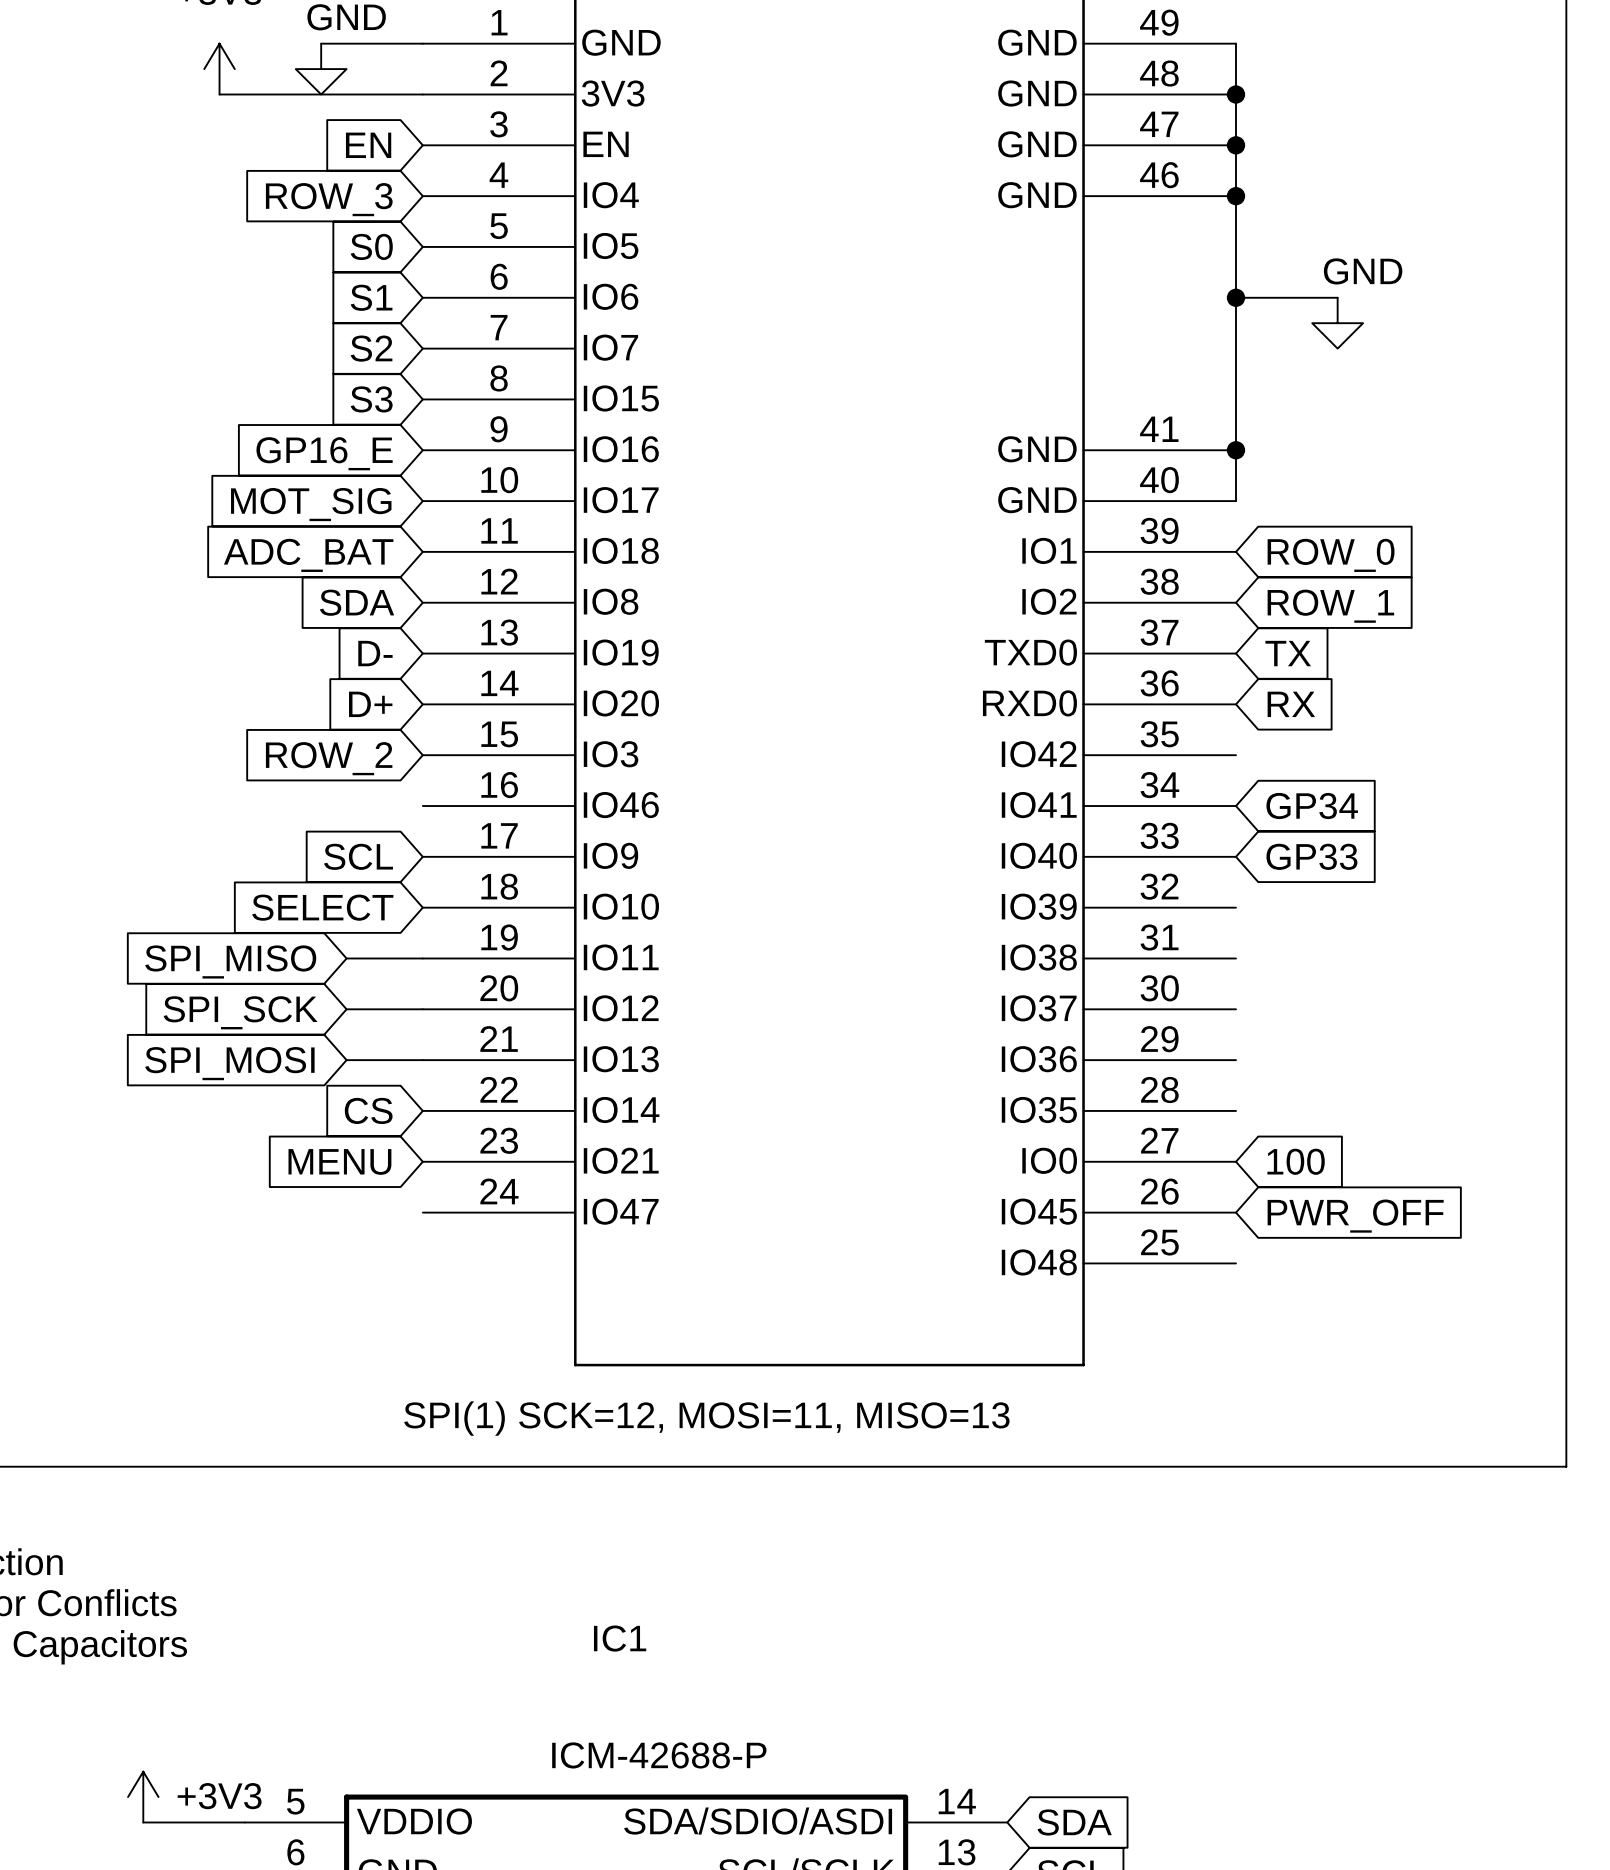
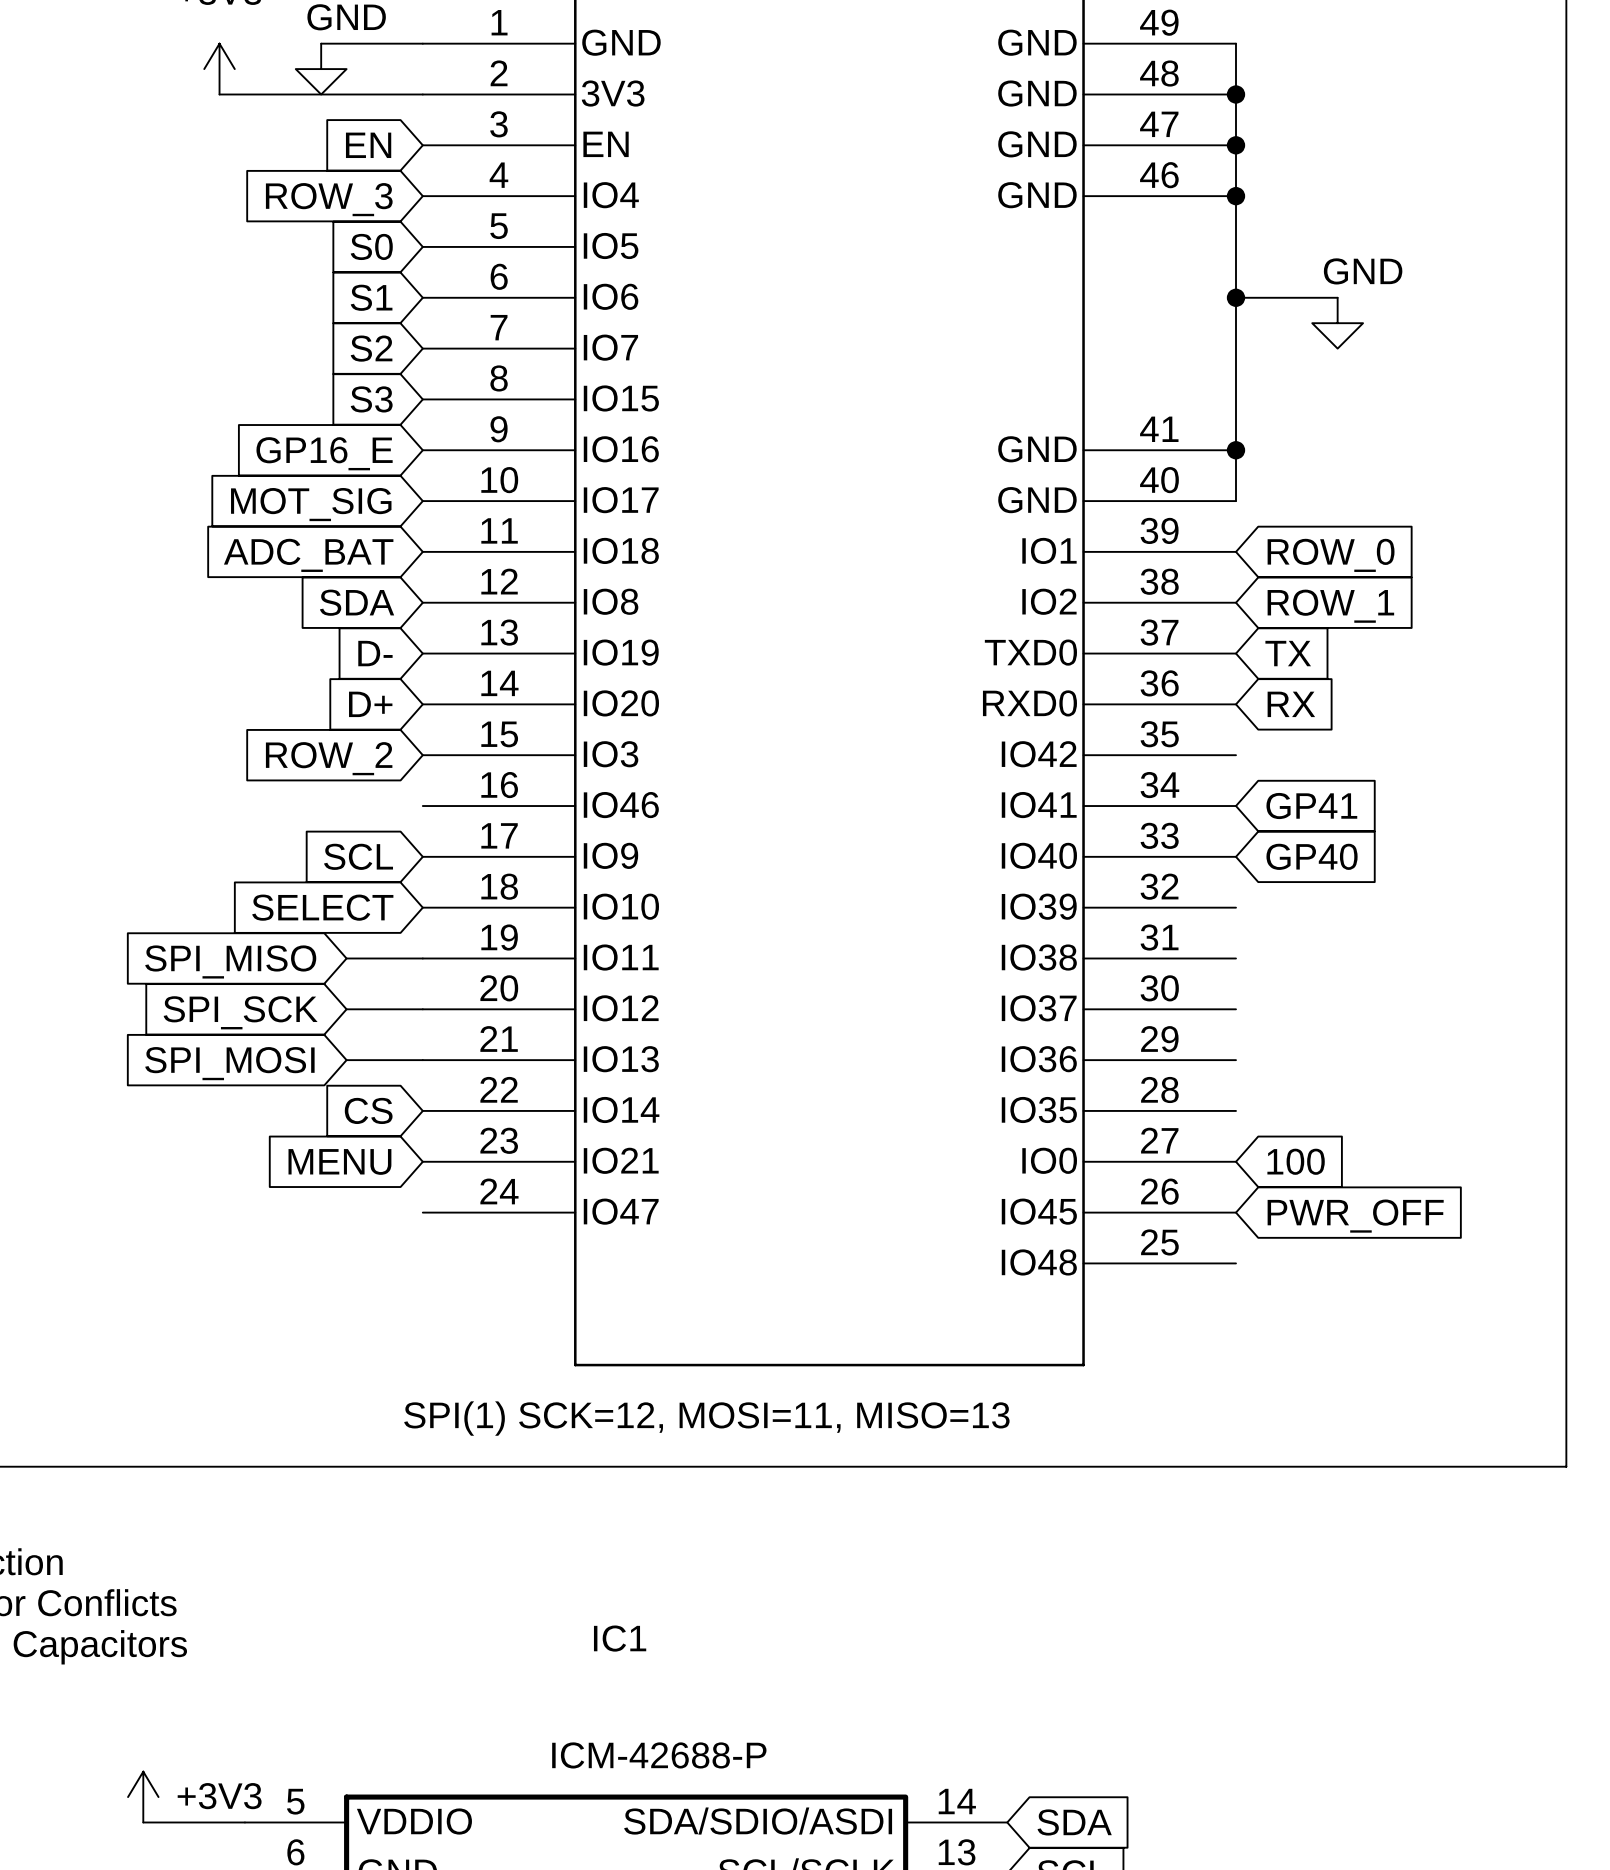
global label: GP34 (1312, 806) -> GP41 (1311, 806)
global label: GP33 (1311, 856) -> GP40 (1312, 856)

